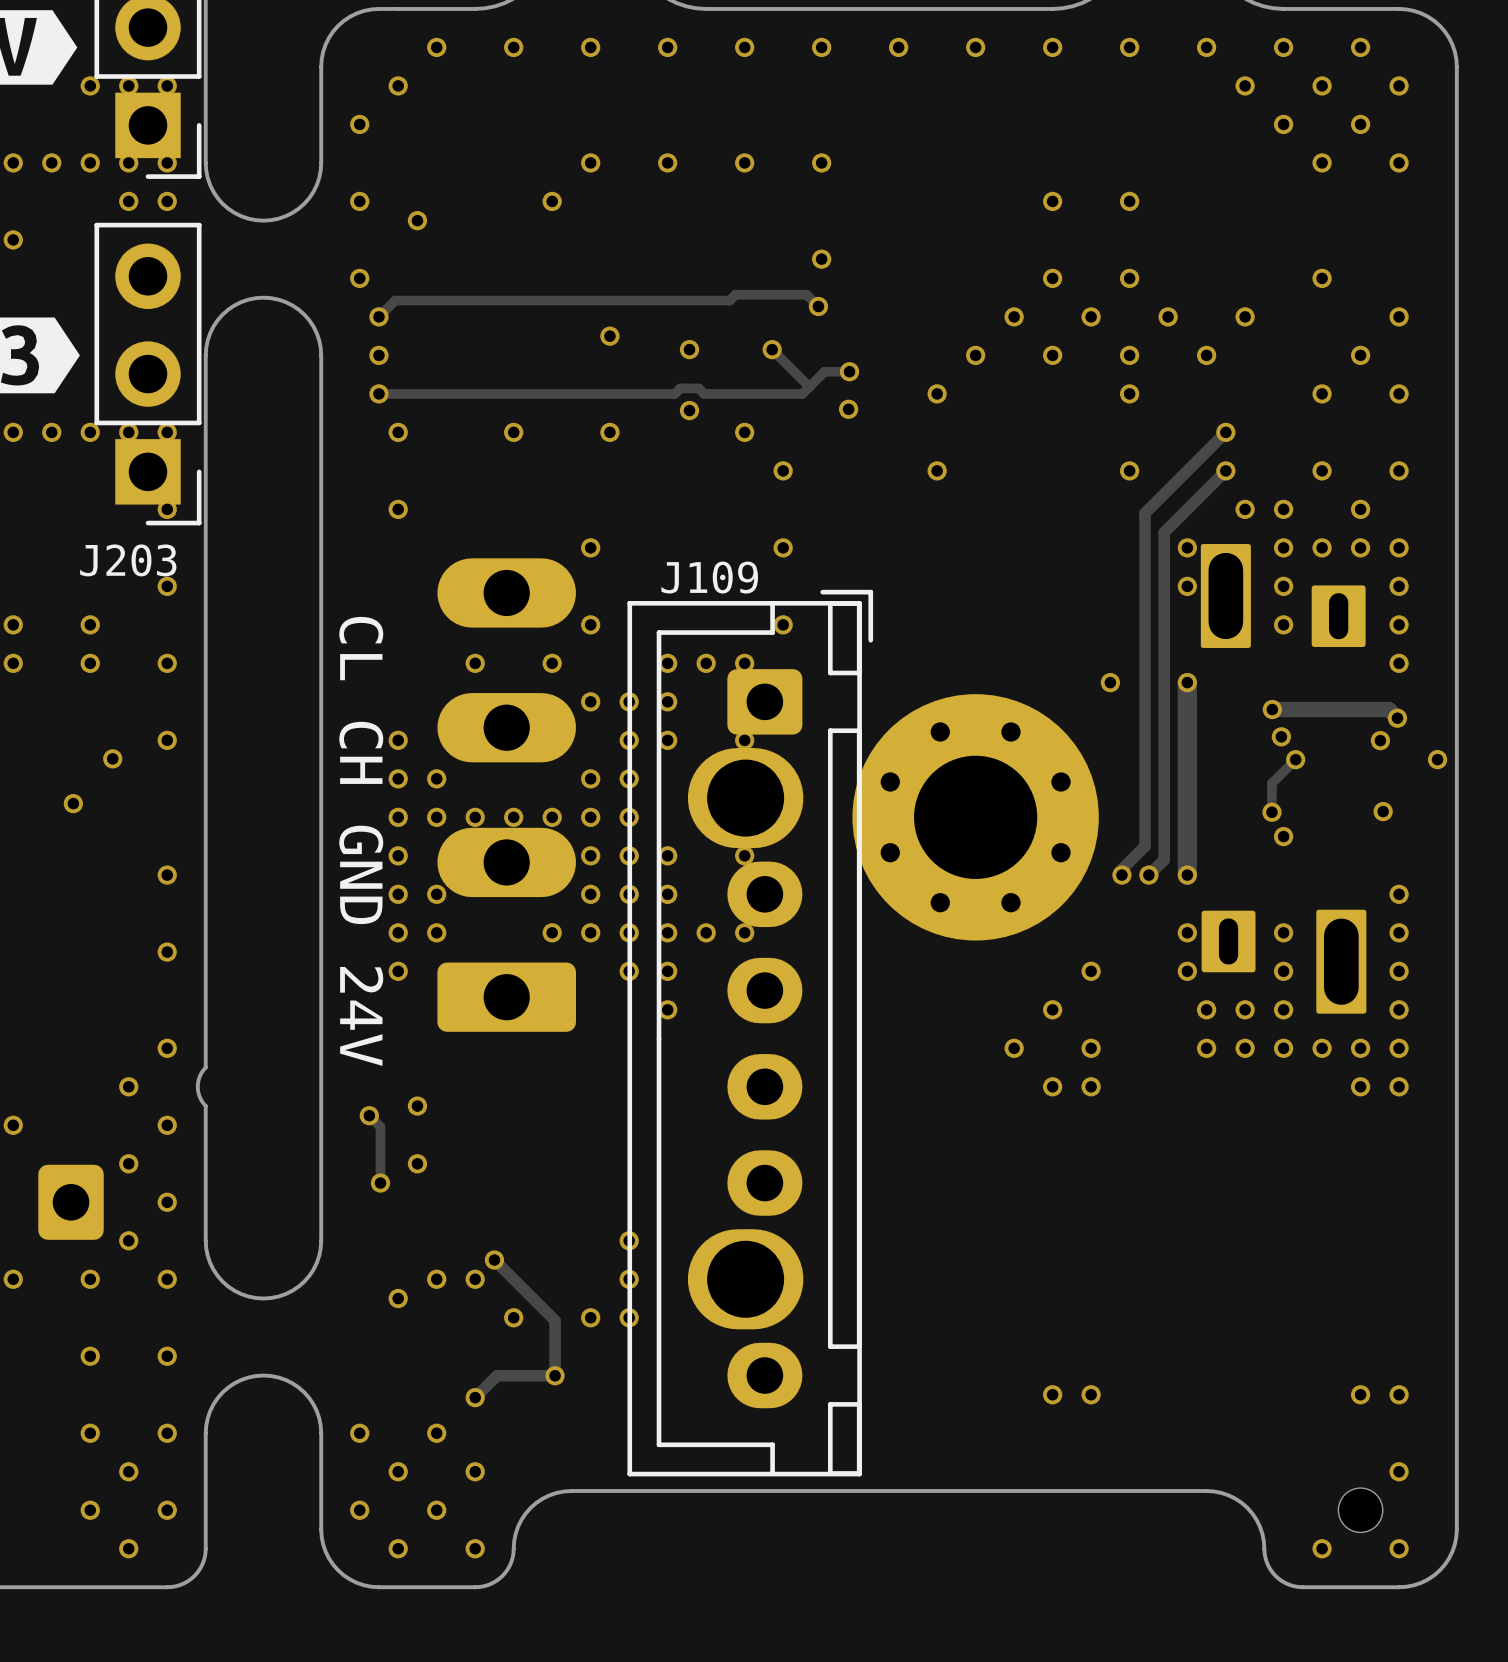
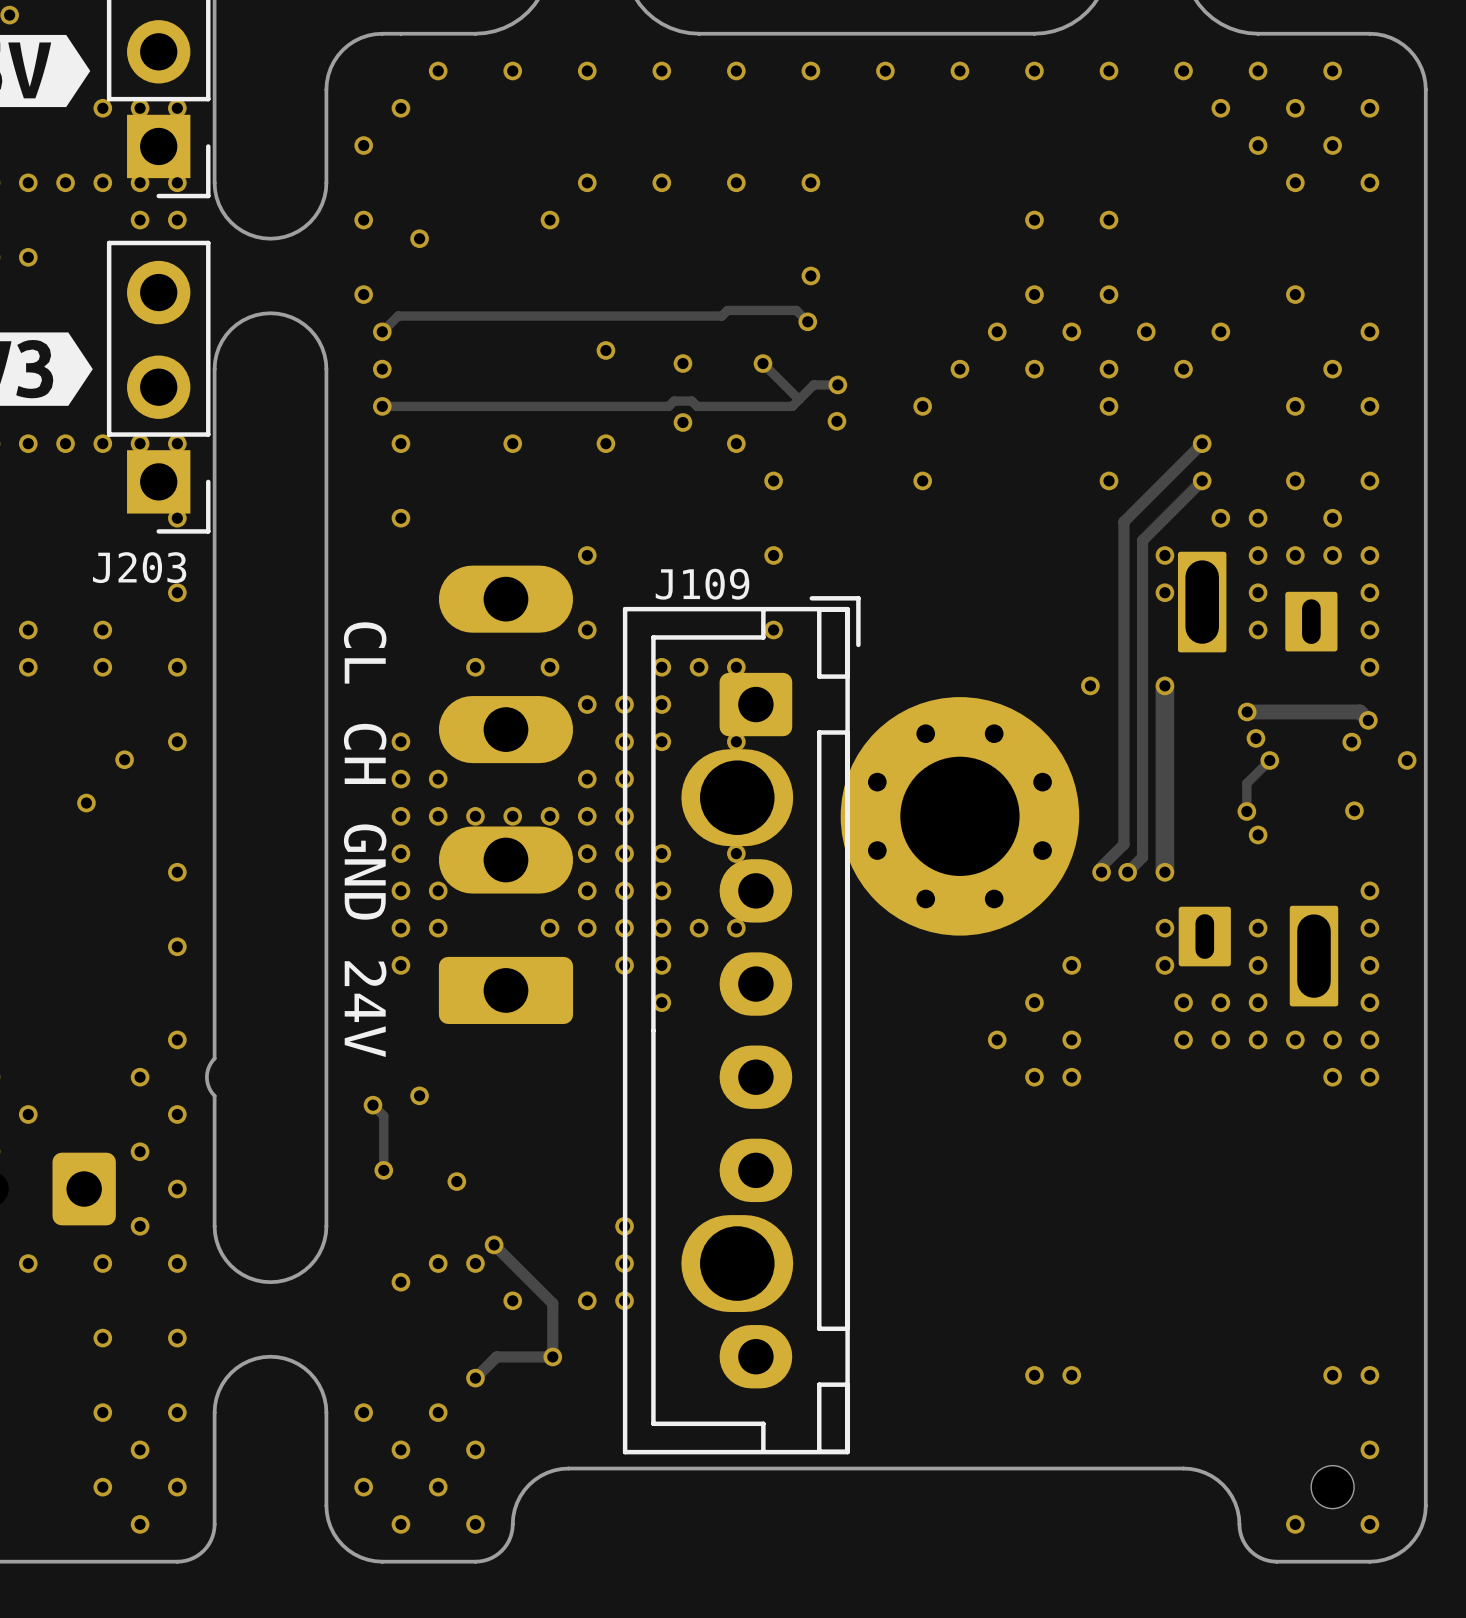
via position: (417, 1163) -> (456, 1181)

